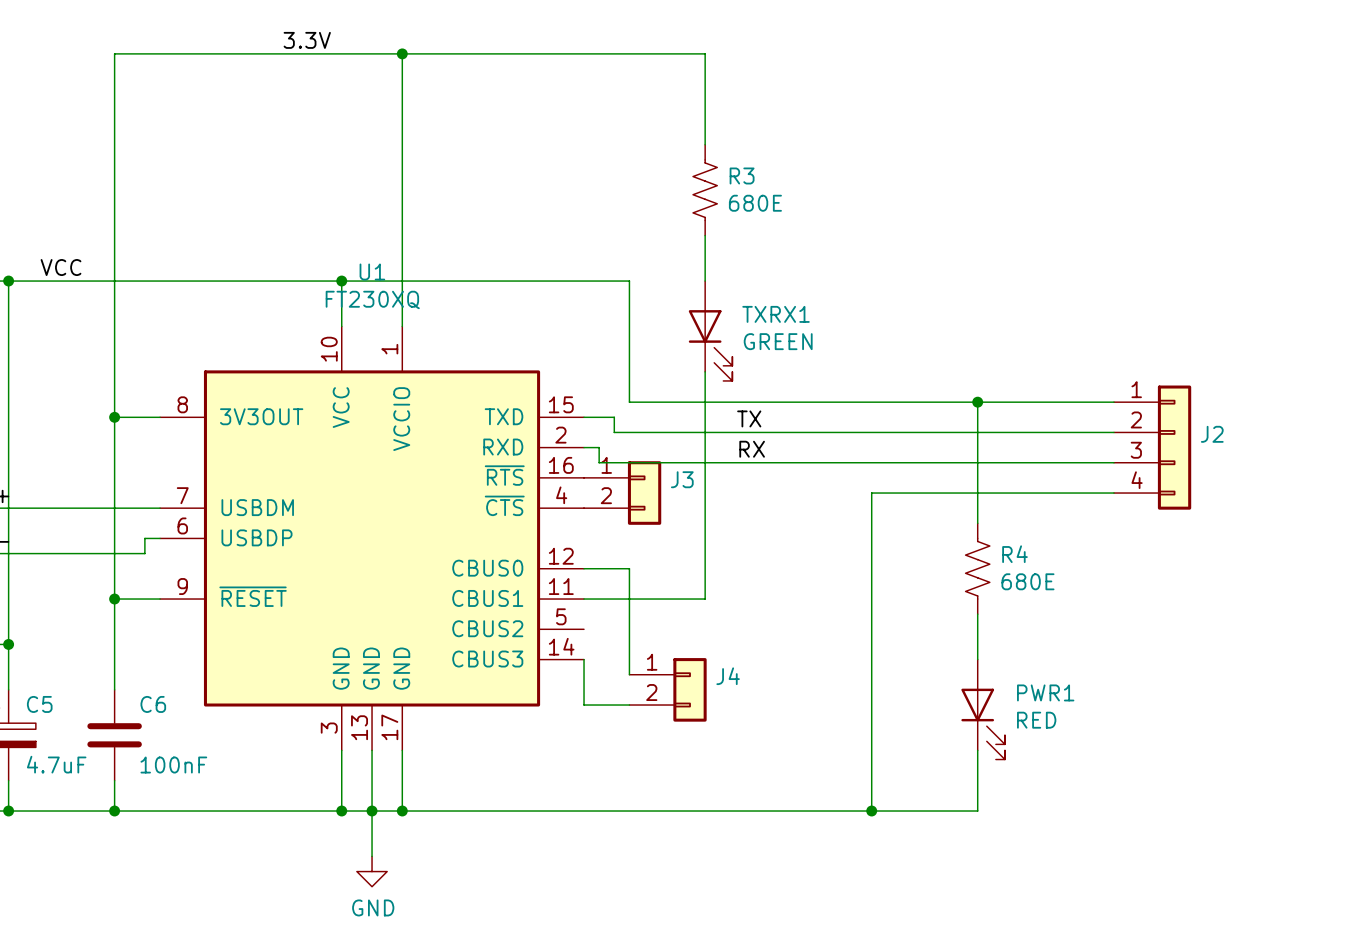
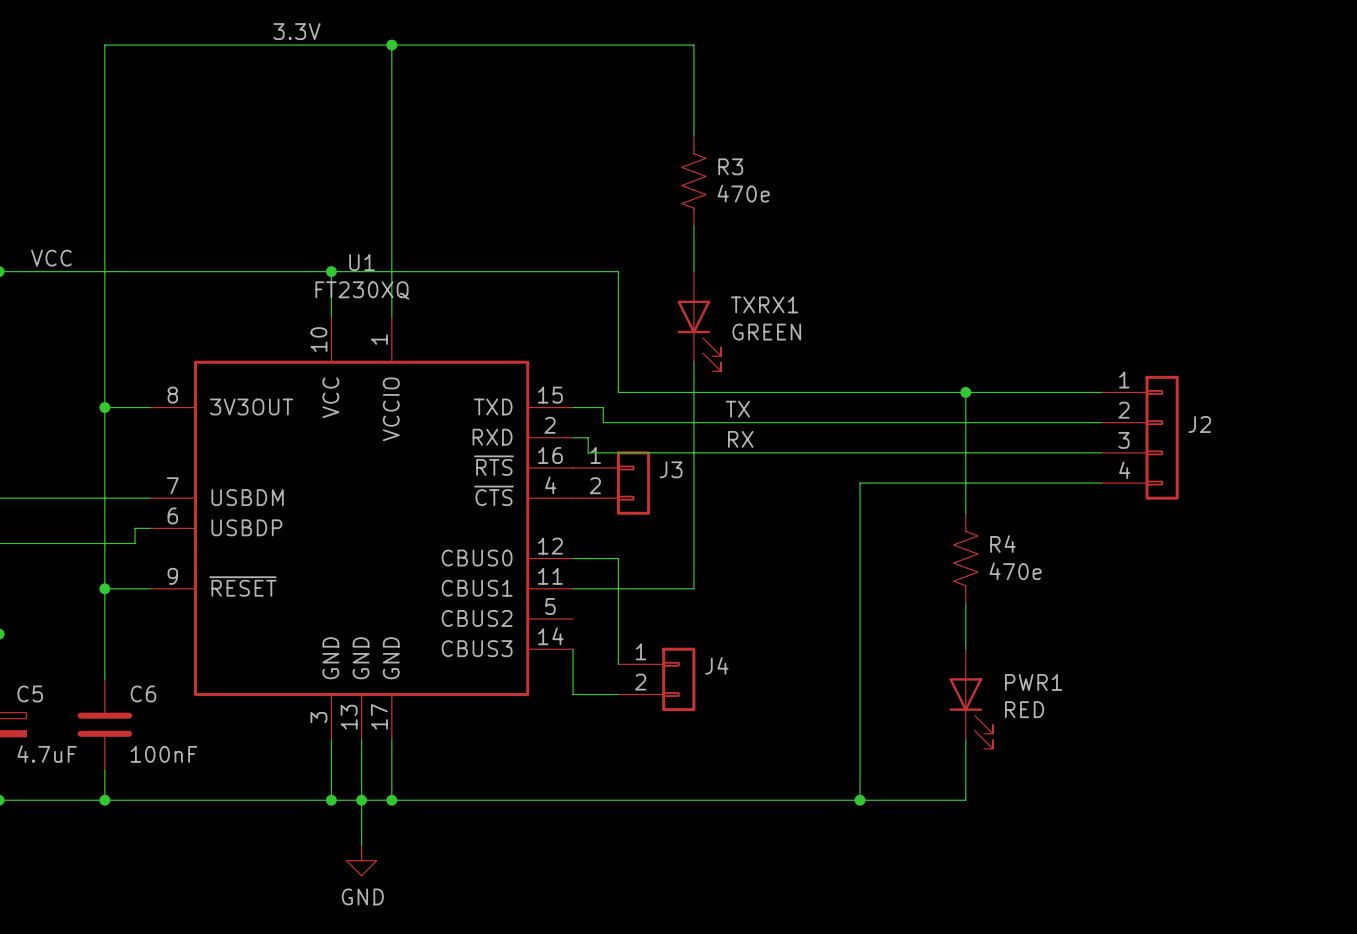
R3 value: 680E (755, 203) -> 470e (743, 193)
R4 value: 680E (1027, 581) -> 470e (1015, 571)

